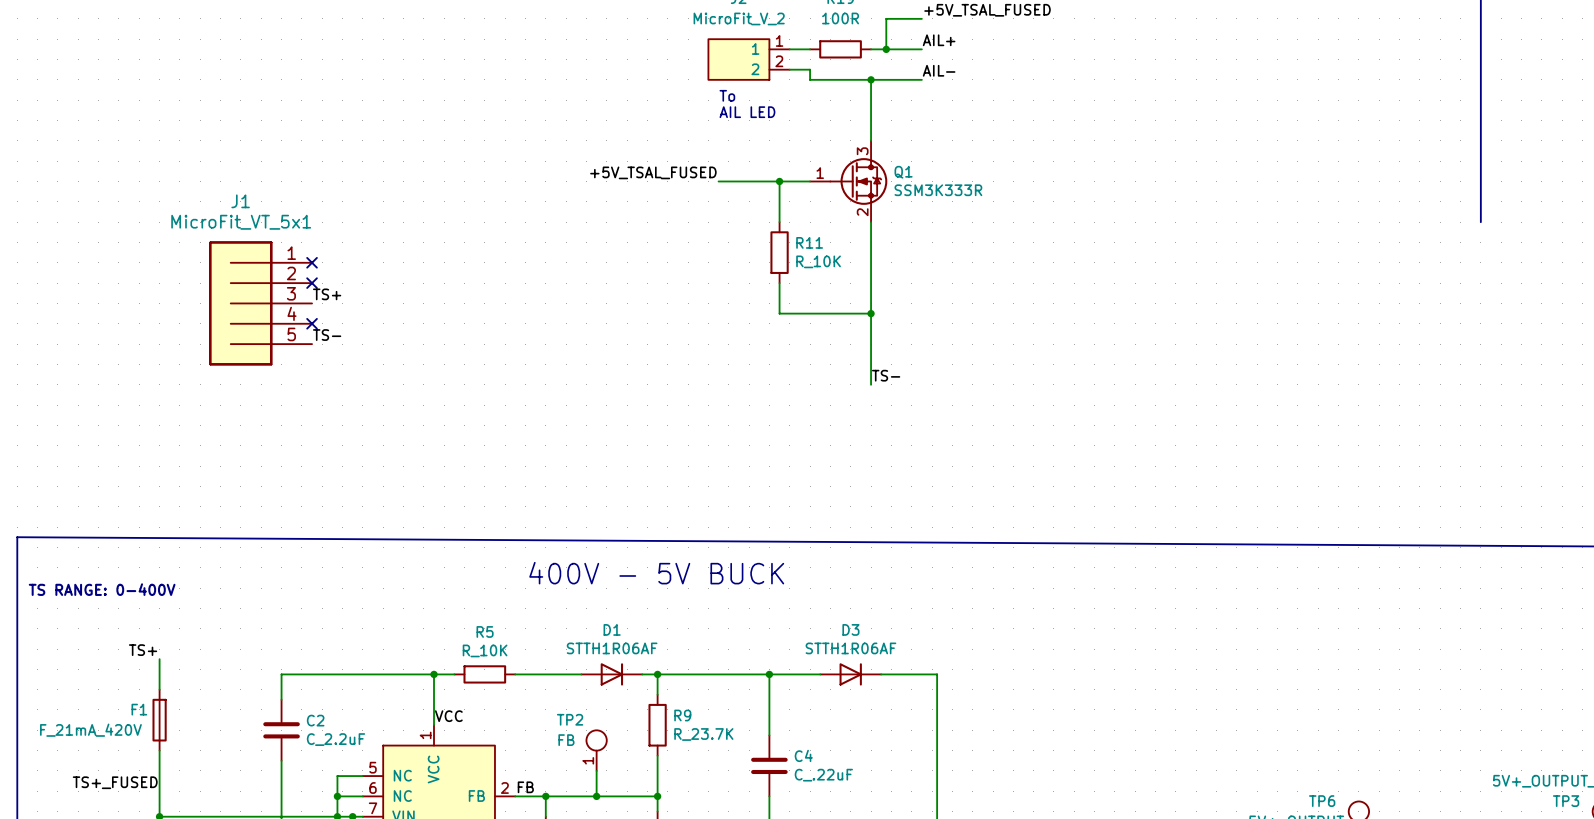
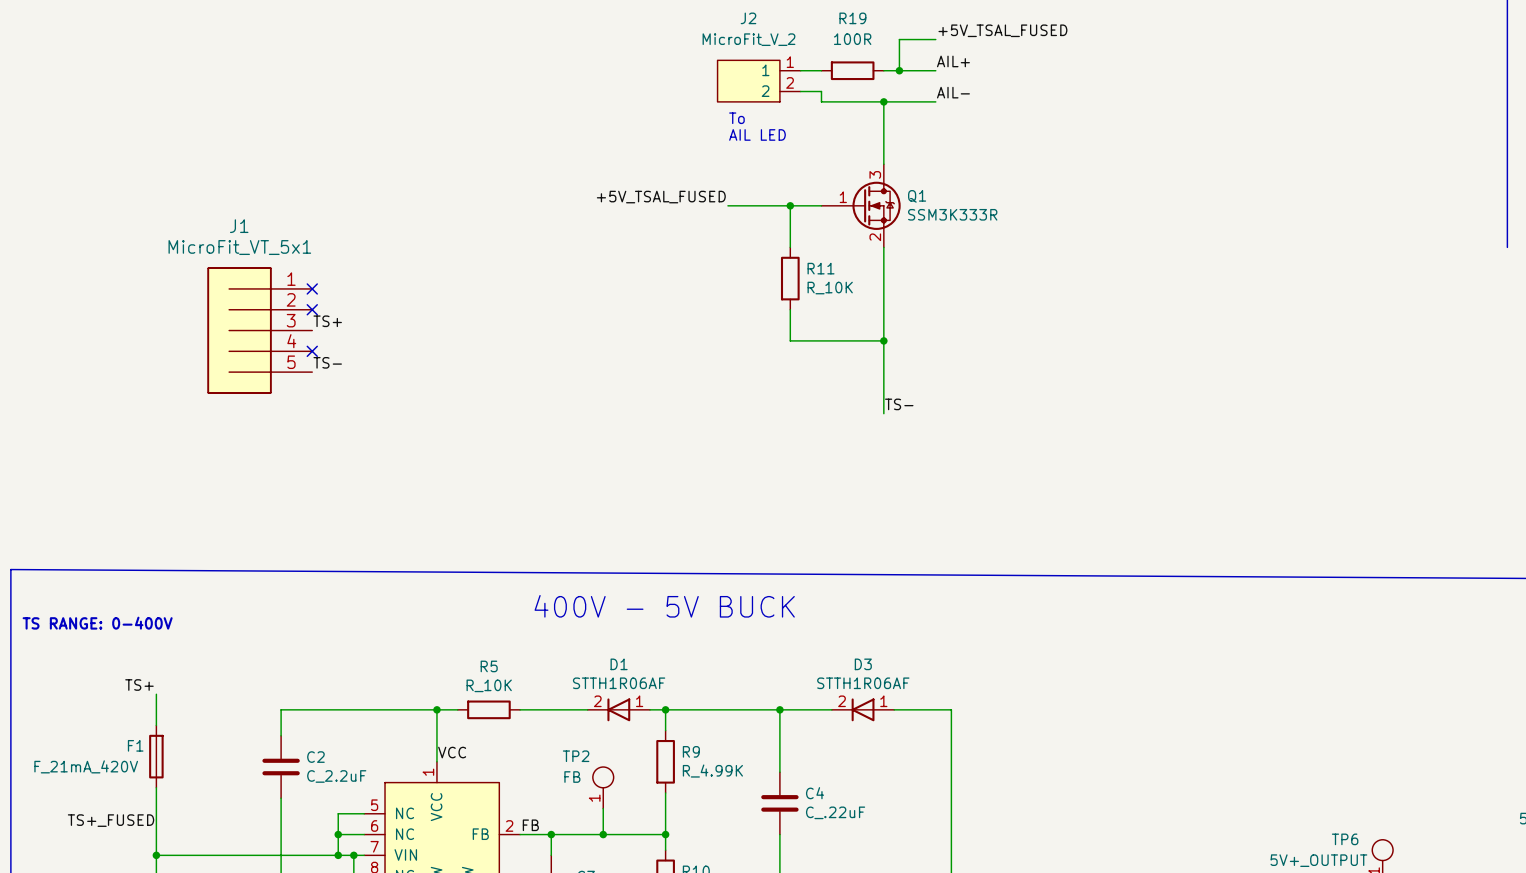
Q1 symbol: [810, 140, 888, 223] -> [821, 164, 901, 248]
D1 symbol: [581, 663, 643, 686] -> [587, 698, 651, 722]
D3 symbol: [820, 663, 882, 686] -> [831, 698, 895, 722]
R9 value: R_23.7K (703, 734) -> R_4.99K (712, 771)

